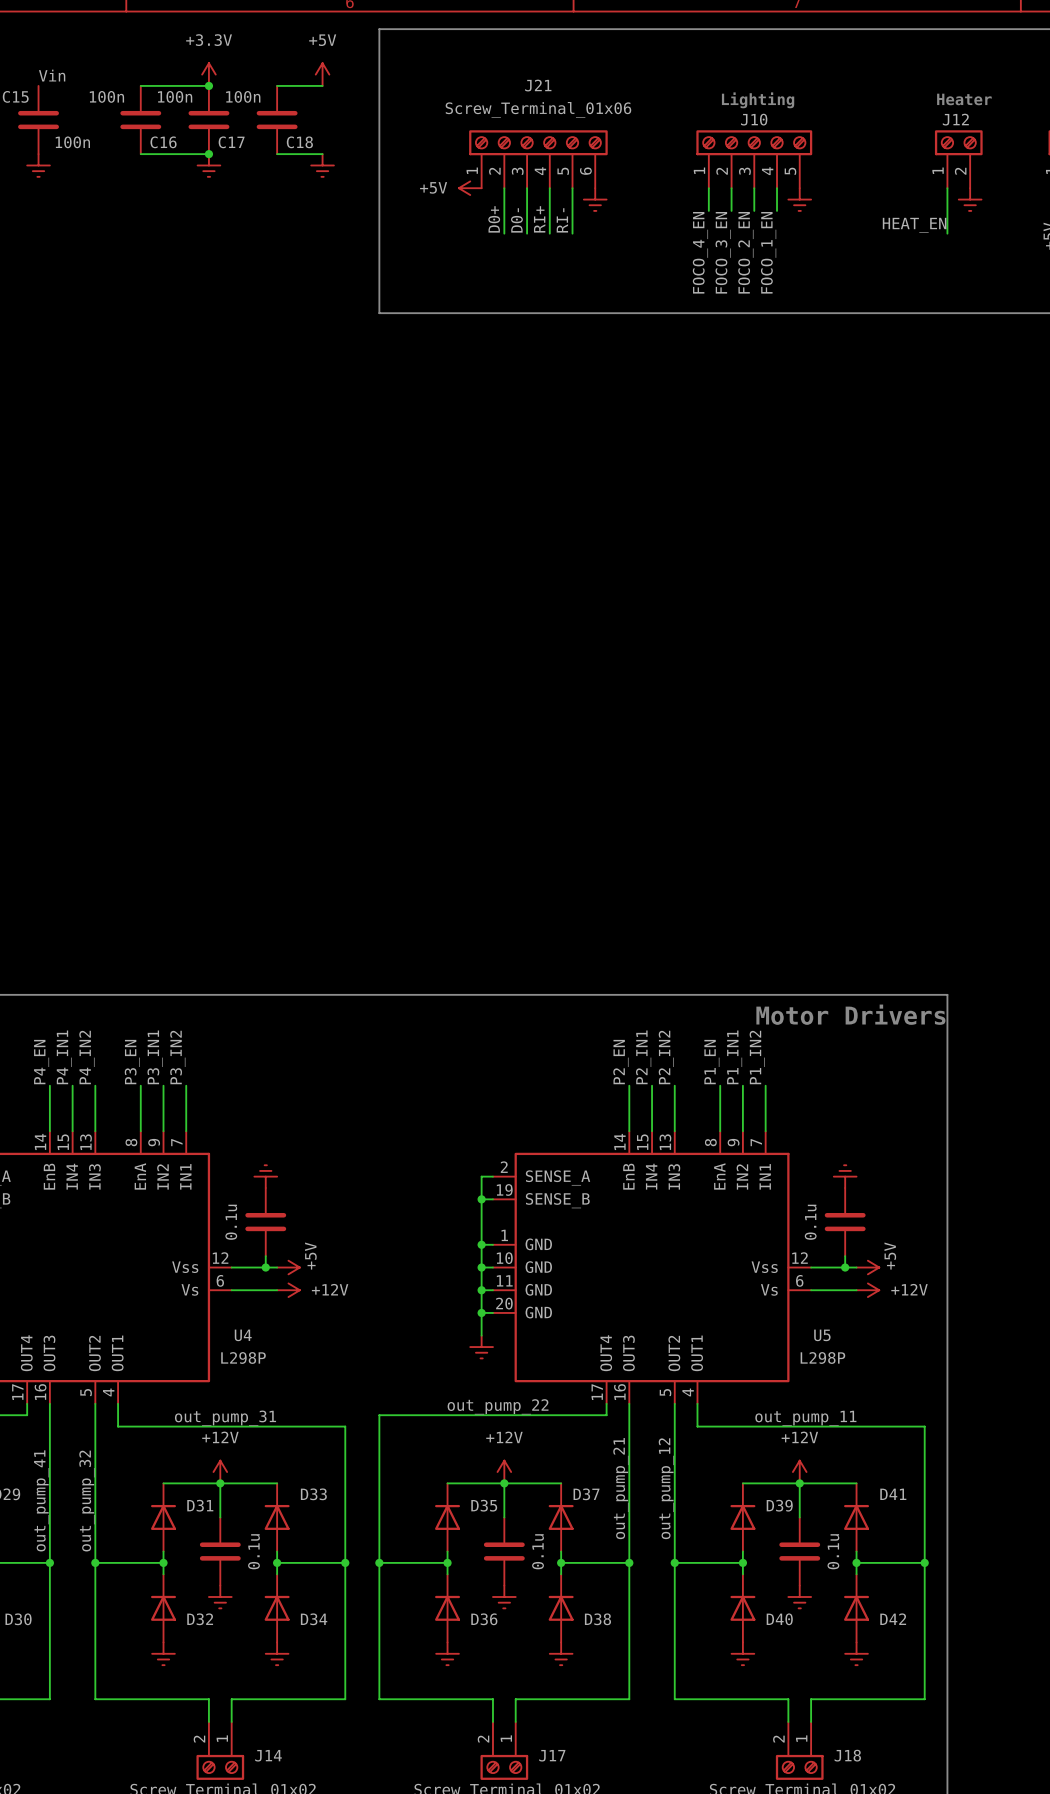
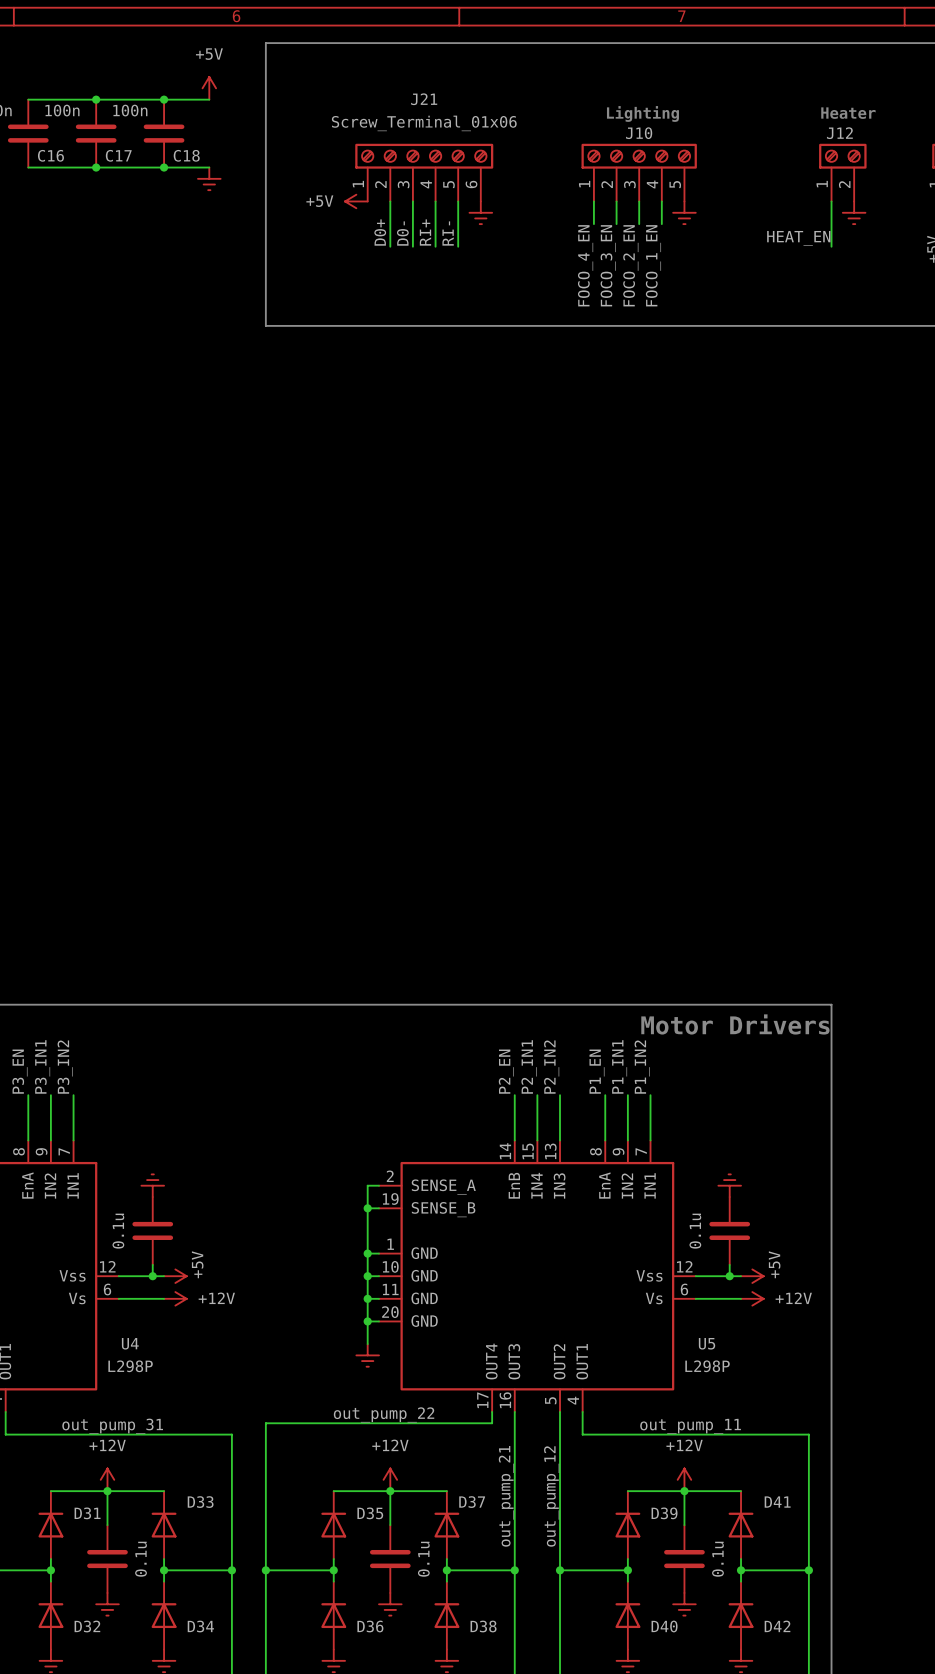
power symbol: +3.3V (208, 74) -> none
wire: none -> (96, 99) (164, 99)
junction: none -> (164, 99)
wire: none -> (96, 167) (164, 167)
junction: none -> (164, 167)
power symbol: (208, 165) -> none

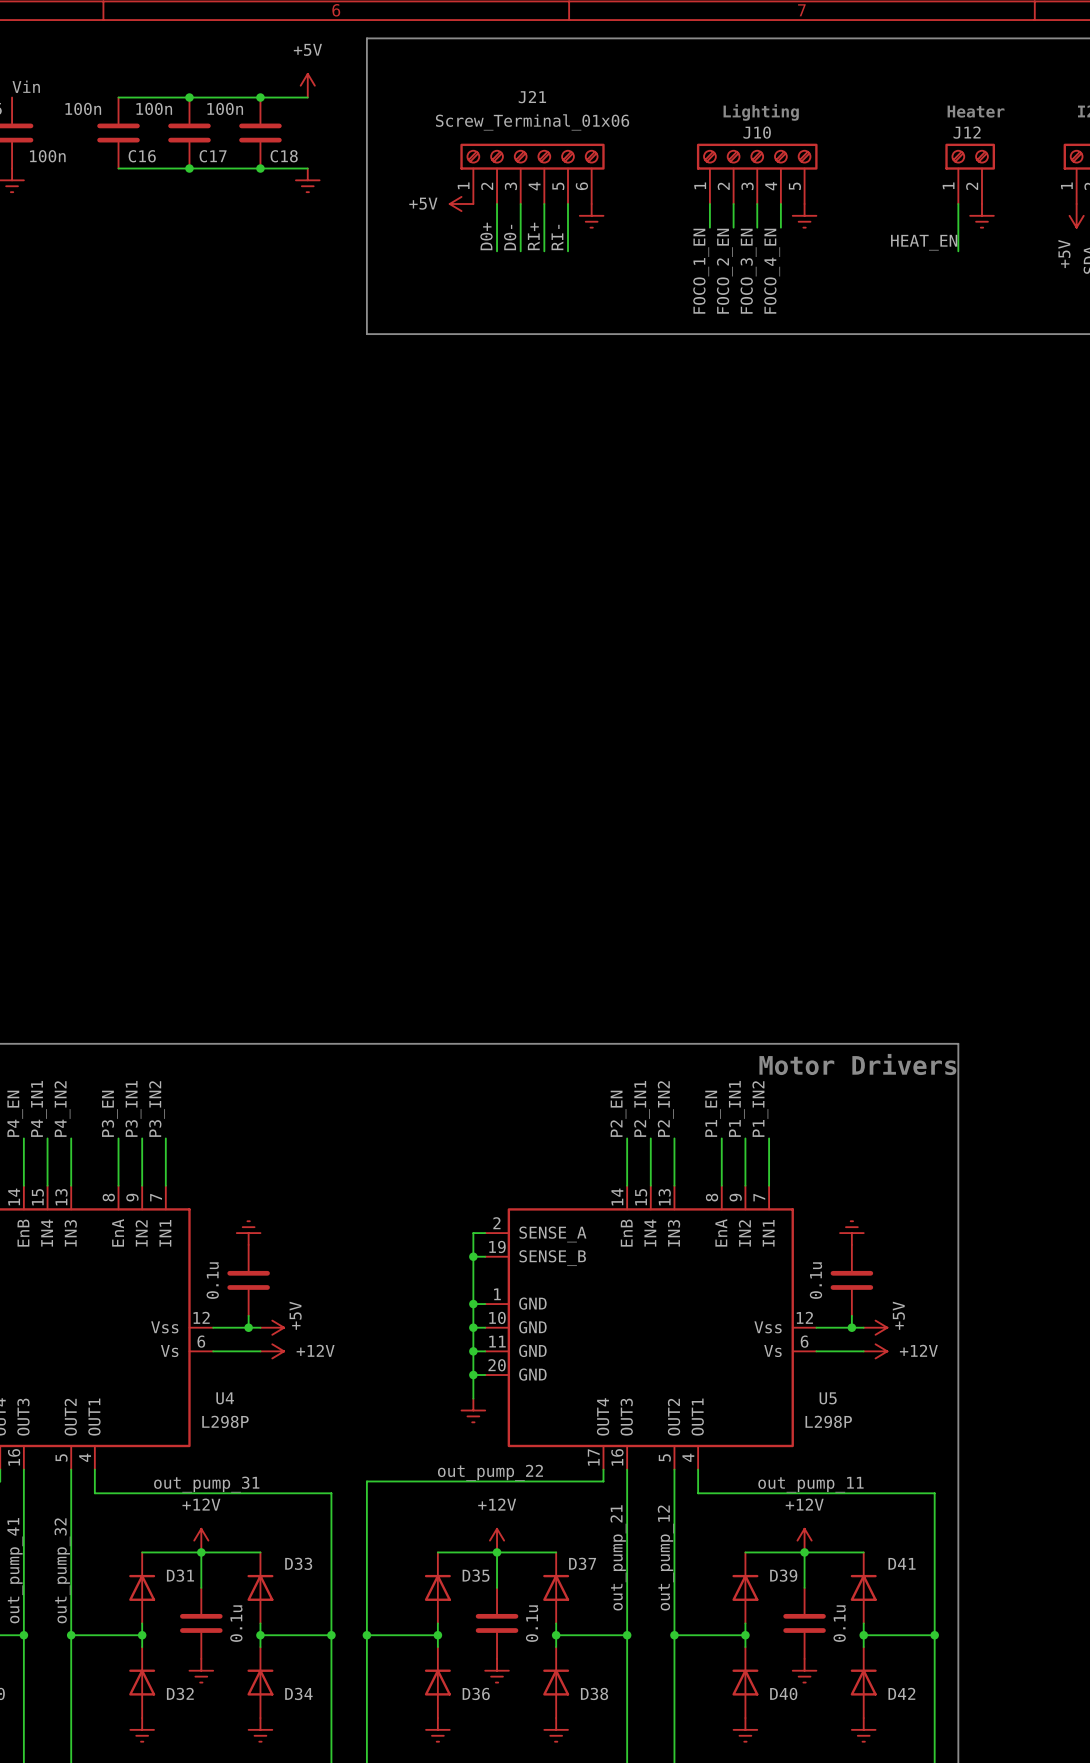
label: FOCO_4_EN (585, 265) -> FOCO_1_EN (701, 271)
label: FOCO_3_EN (608, 265) -> FOCO_2_EN (724, 271)
label: FOCO_2_EN (630, 265) -> FOCO_3_EN (748, 271)
label: FOCO_1_EN (653, 265) -> FOCO_4_EN (772, 271)

